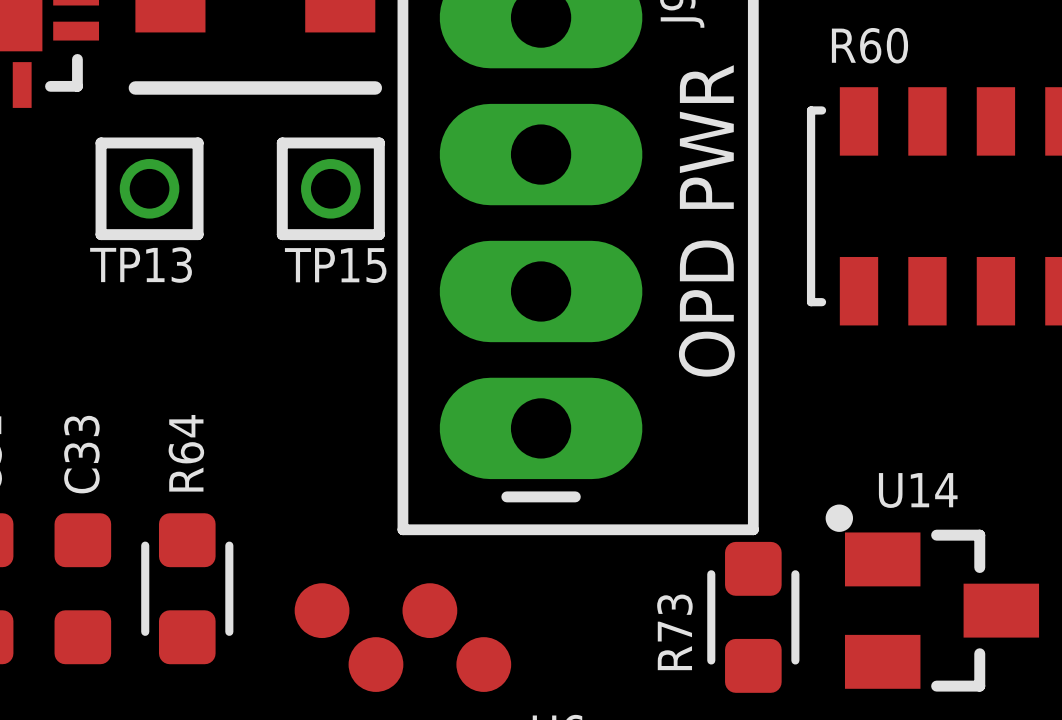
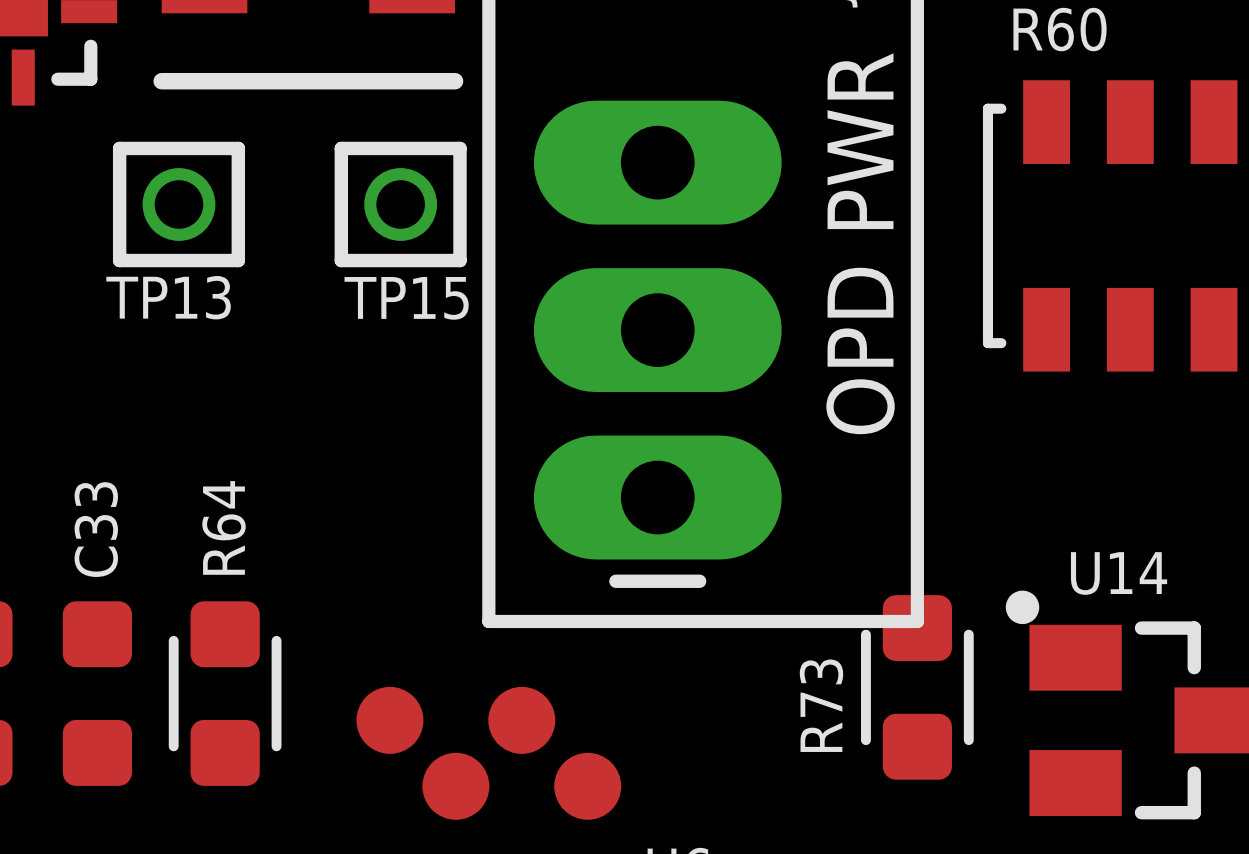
R73 position: (753, 617) -> (917, 687)

